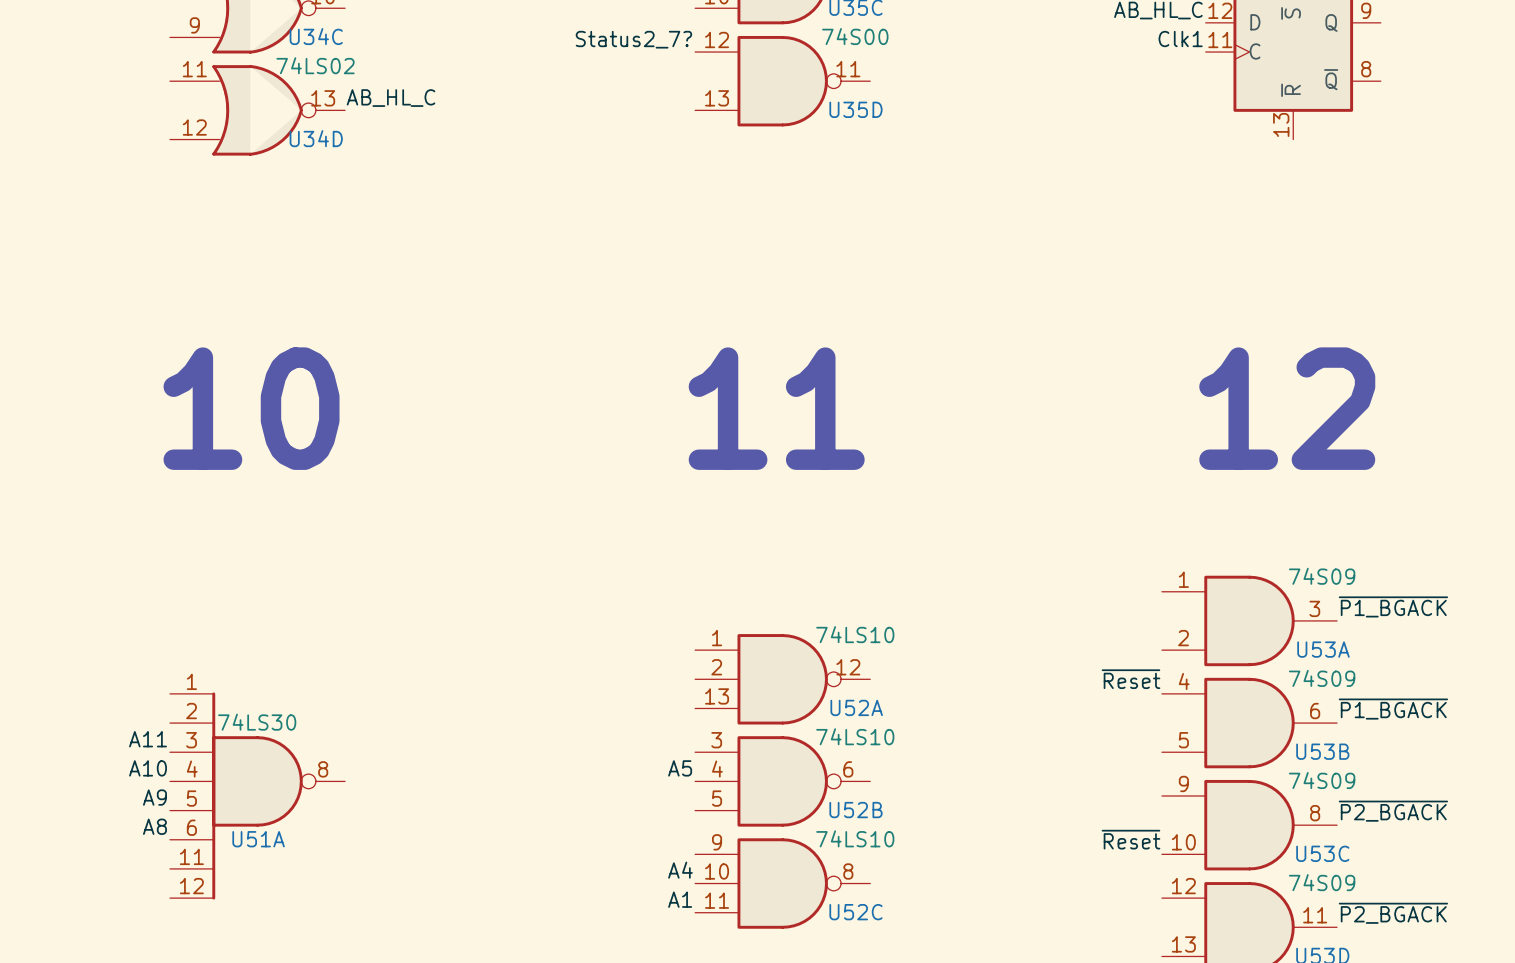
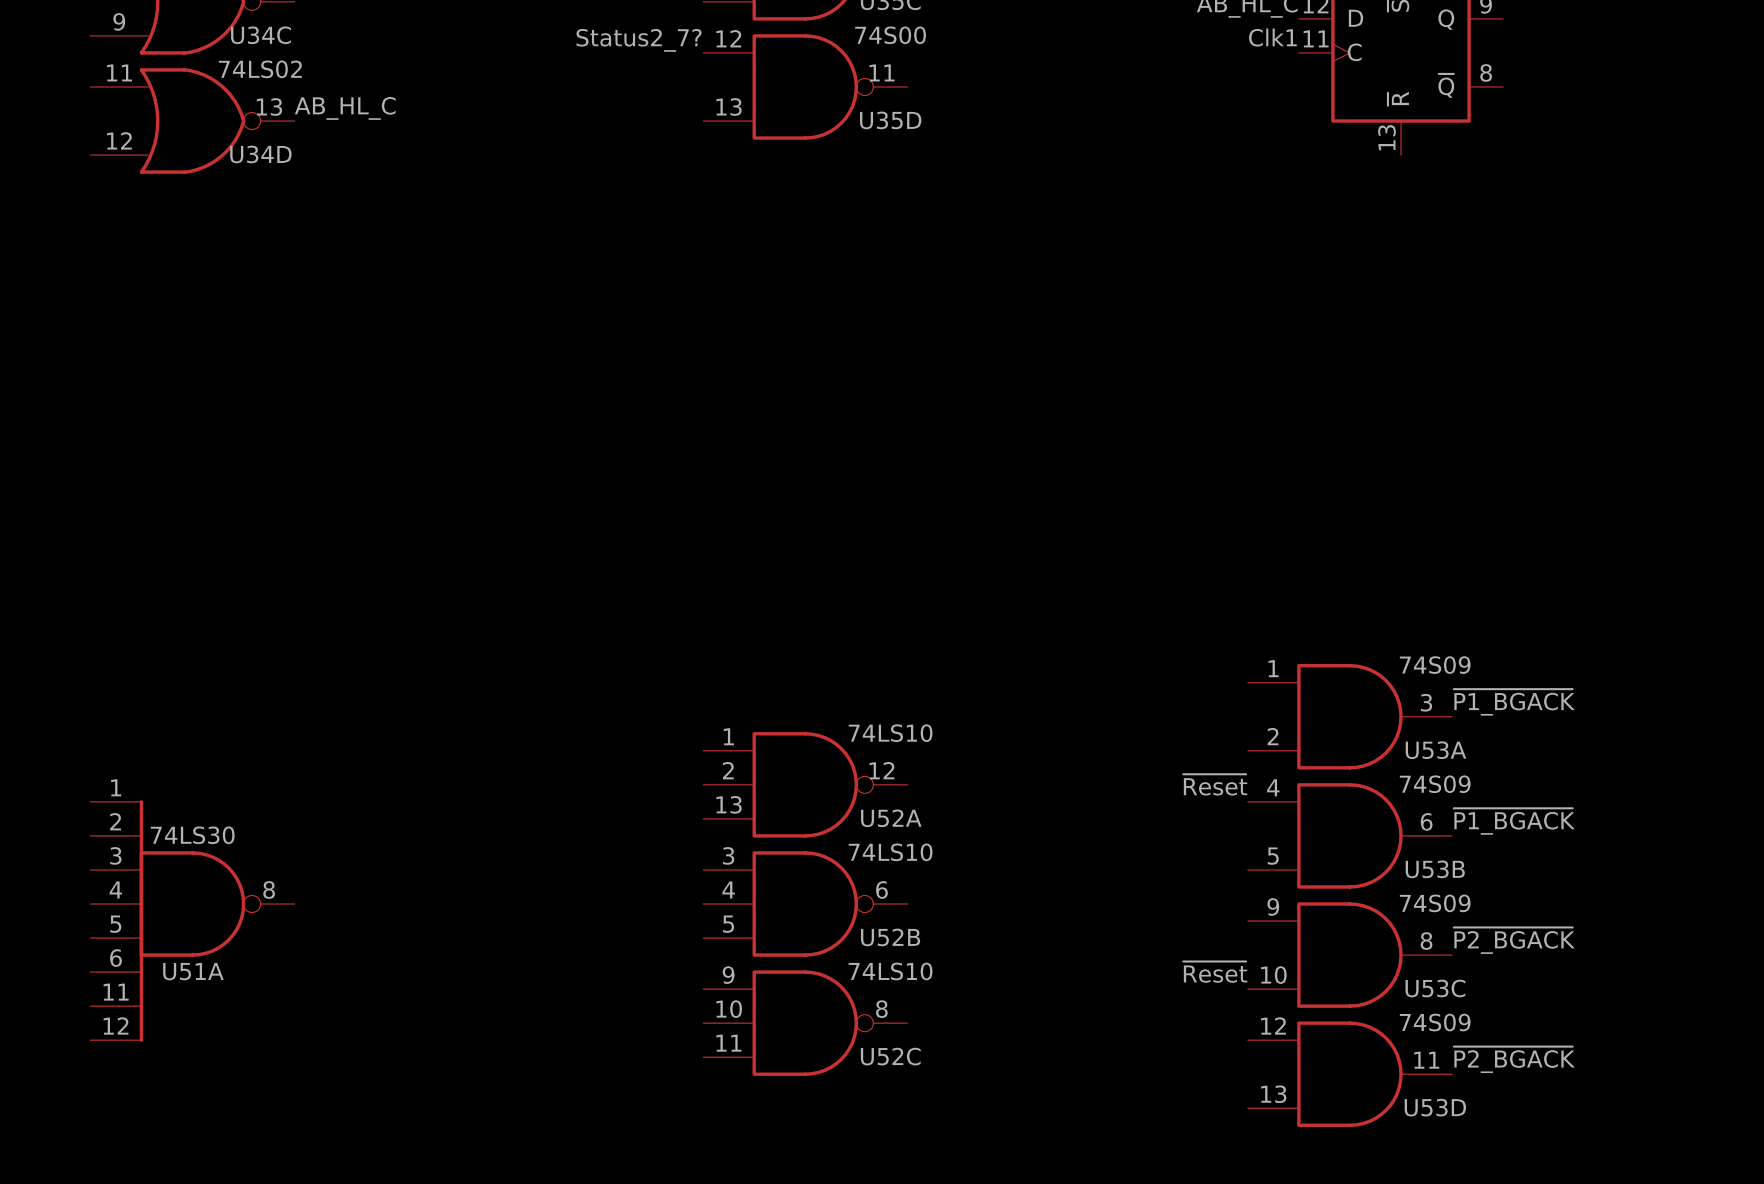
text: 10 (251, 408) -> none
text: 11 (776, 408) -> none
text: 12 (1287, 408) -> none
label: A11 (148, 739) -> none
label: A10 (148, 768) -> none
label: A5 (680, 768) -> none
label: A9 (154, 797) -> none
label: A8 (154, 826) -> none
label: A4 (680, 870) -> none
label: A1 (680, 899) -> none

